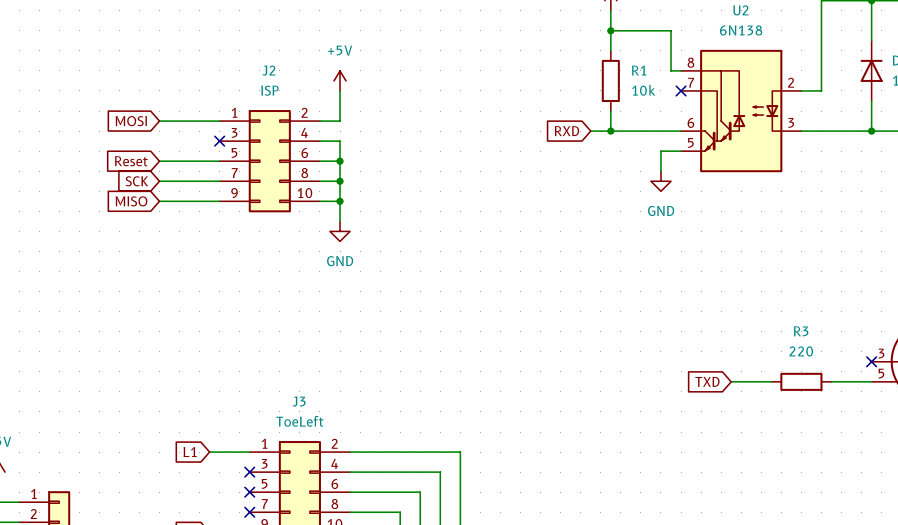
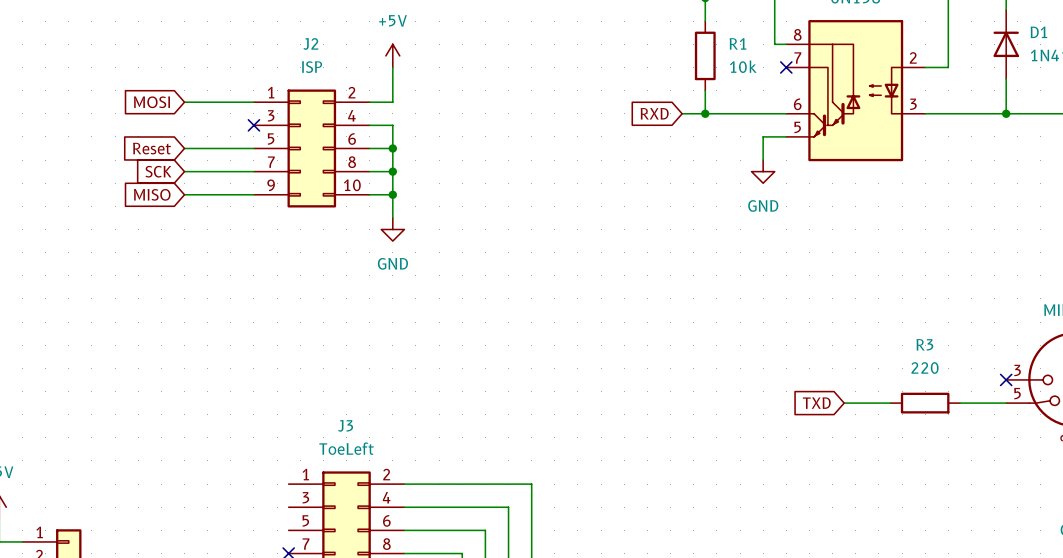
global label: L1 (190, 452) -> none
wire: (209, 452) (249, 452) -> none
no-connect mark: (249, 472) -> none
no-connect mark: (249, 492) -> none

